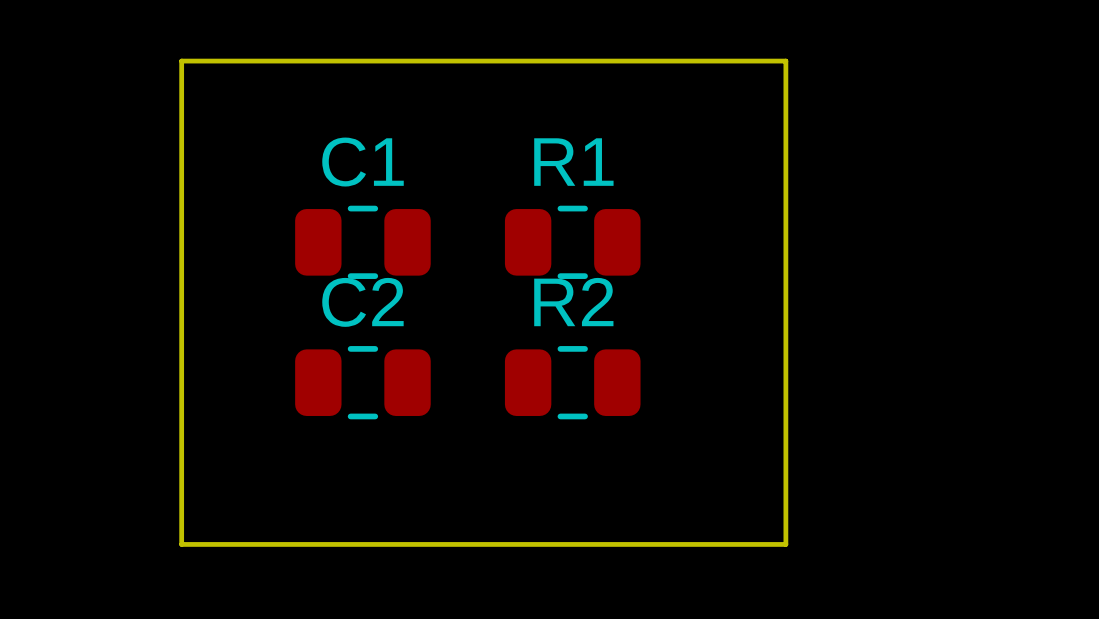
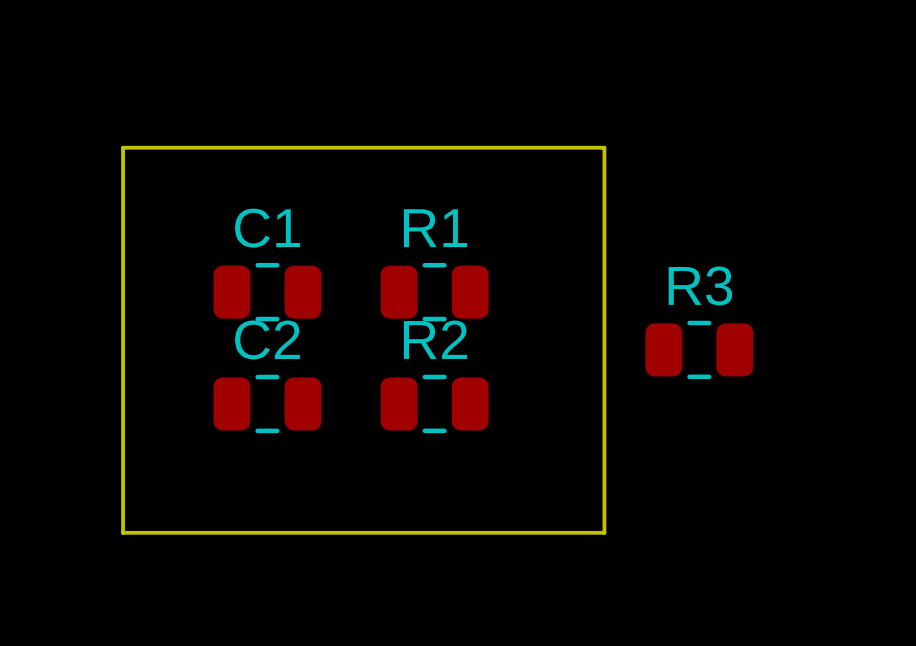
R3: none -> (699, 349)

